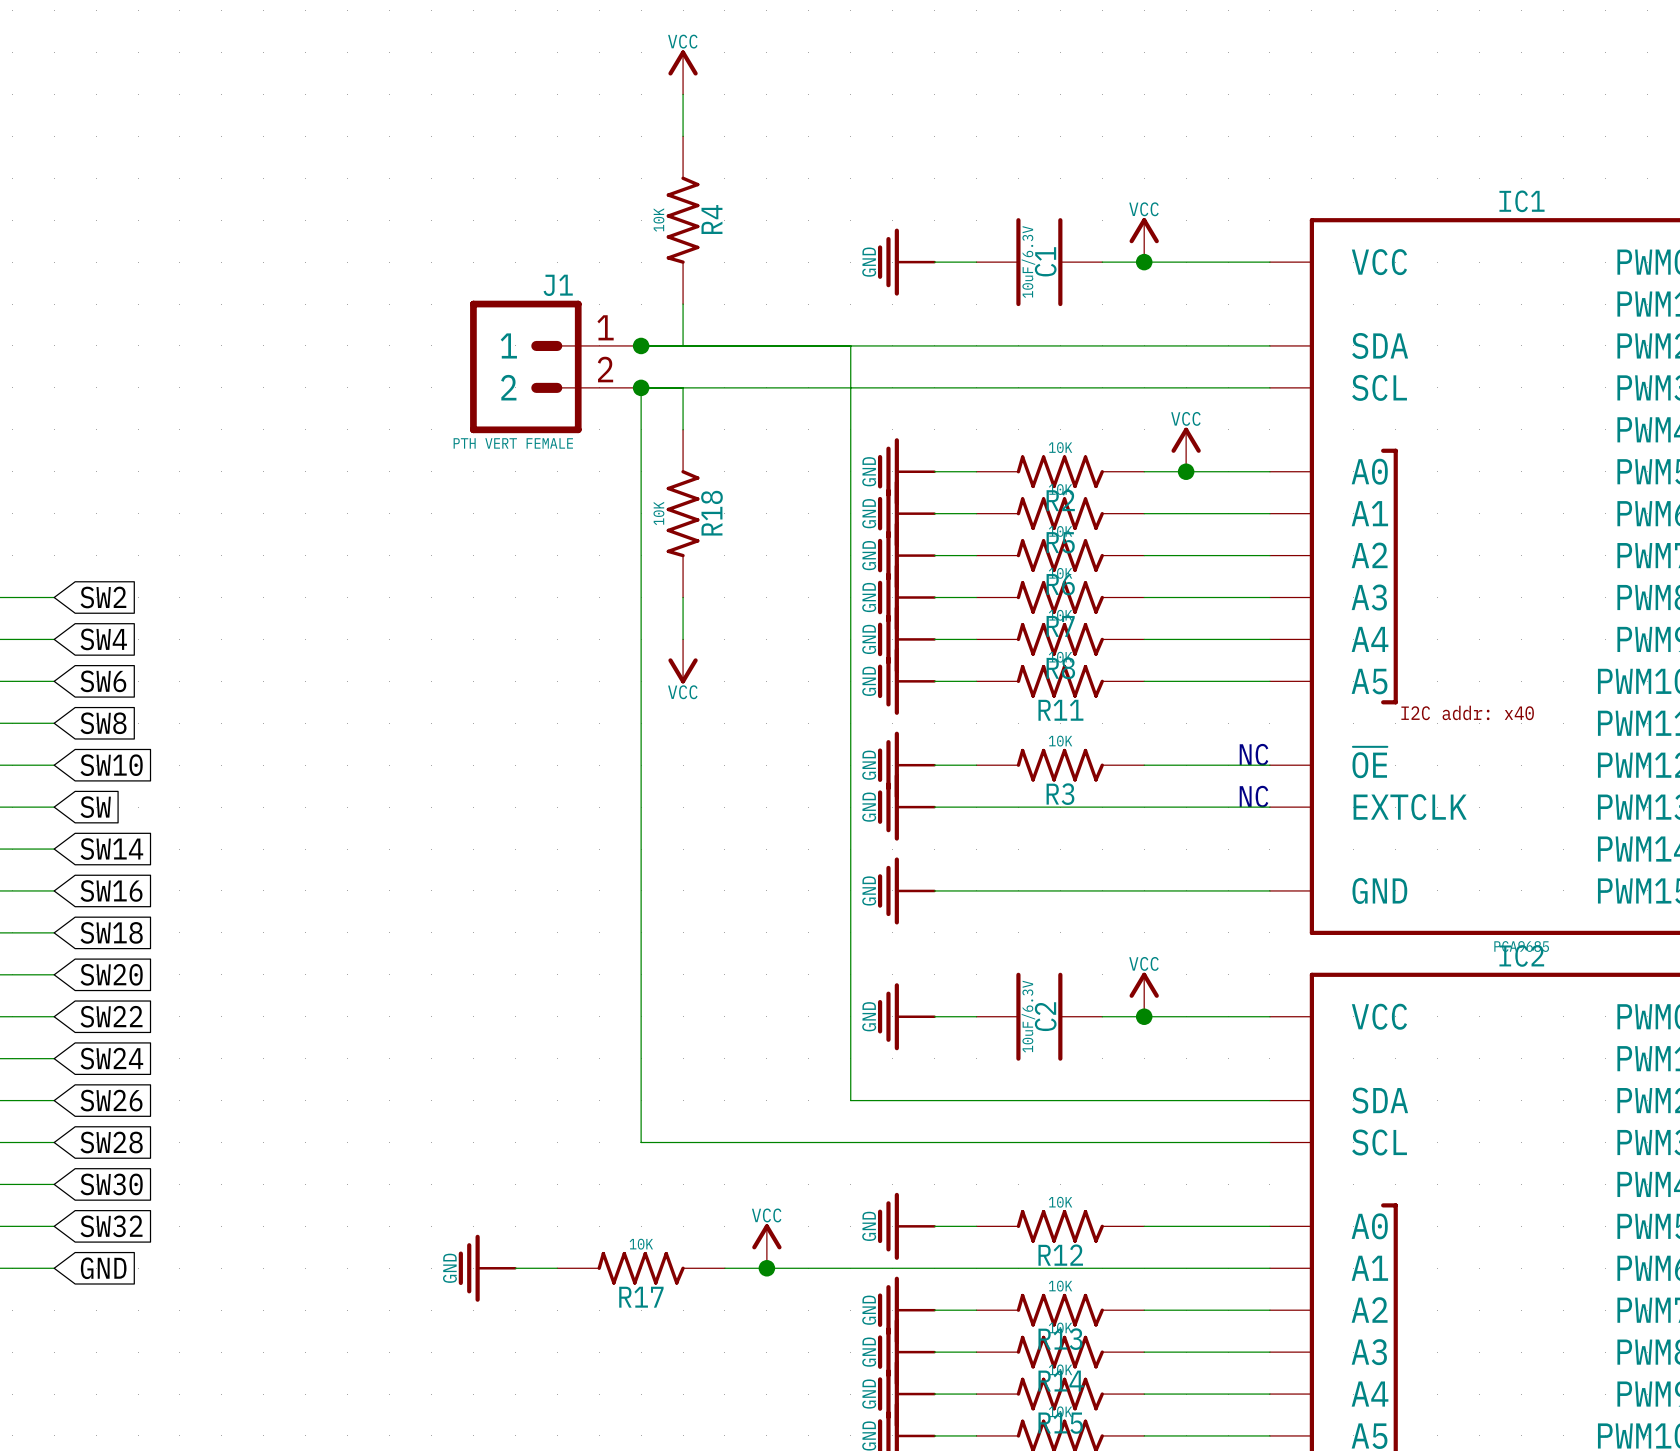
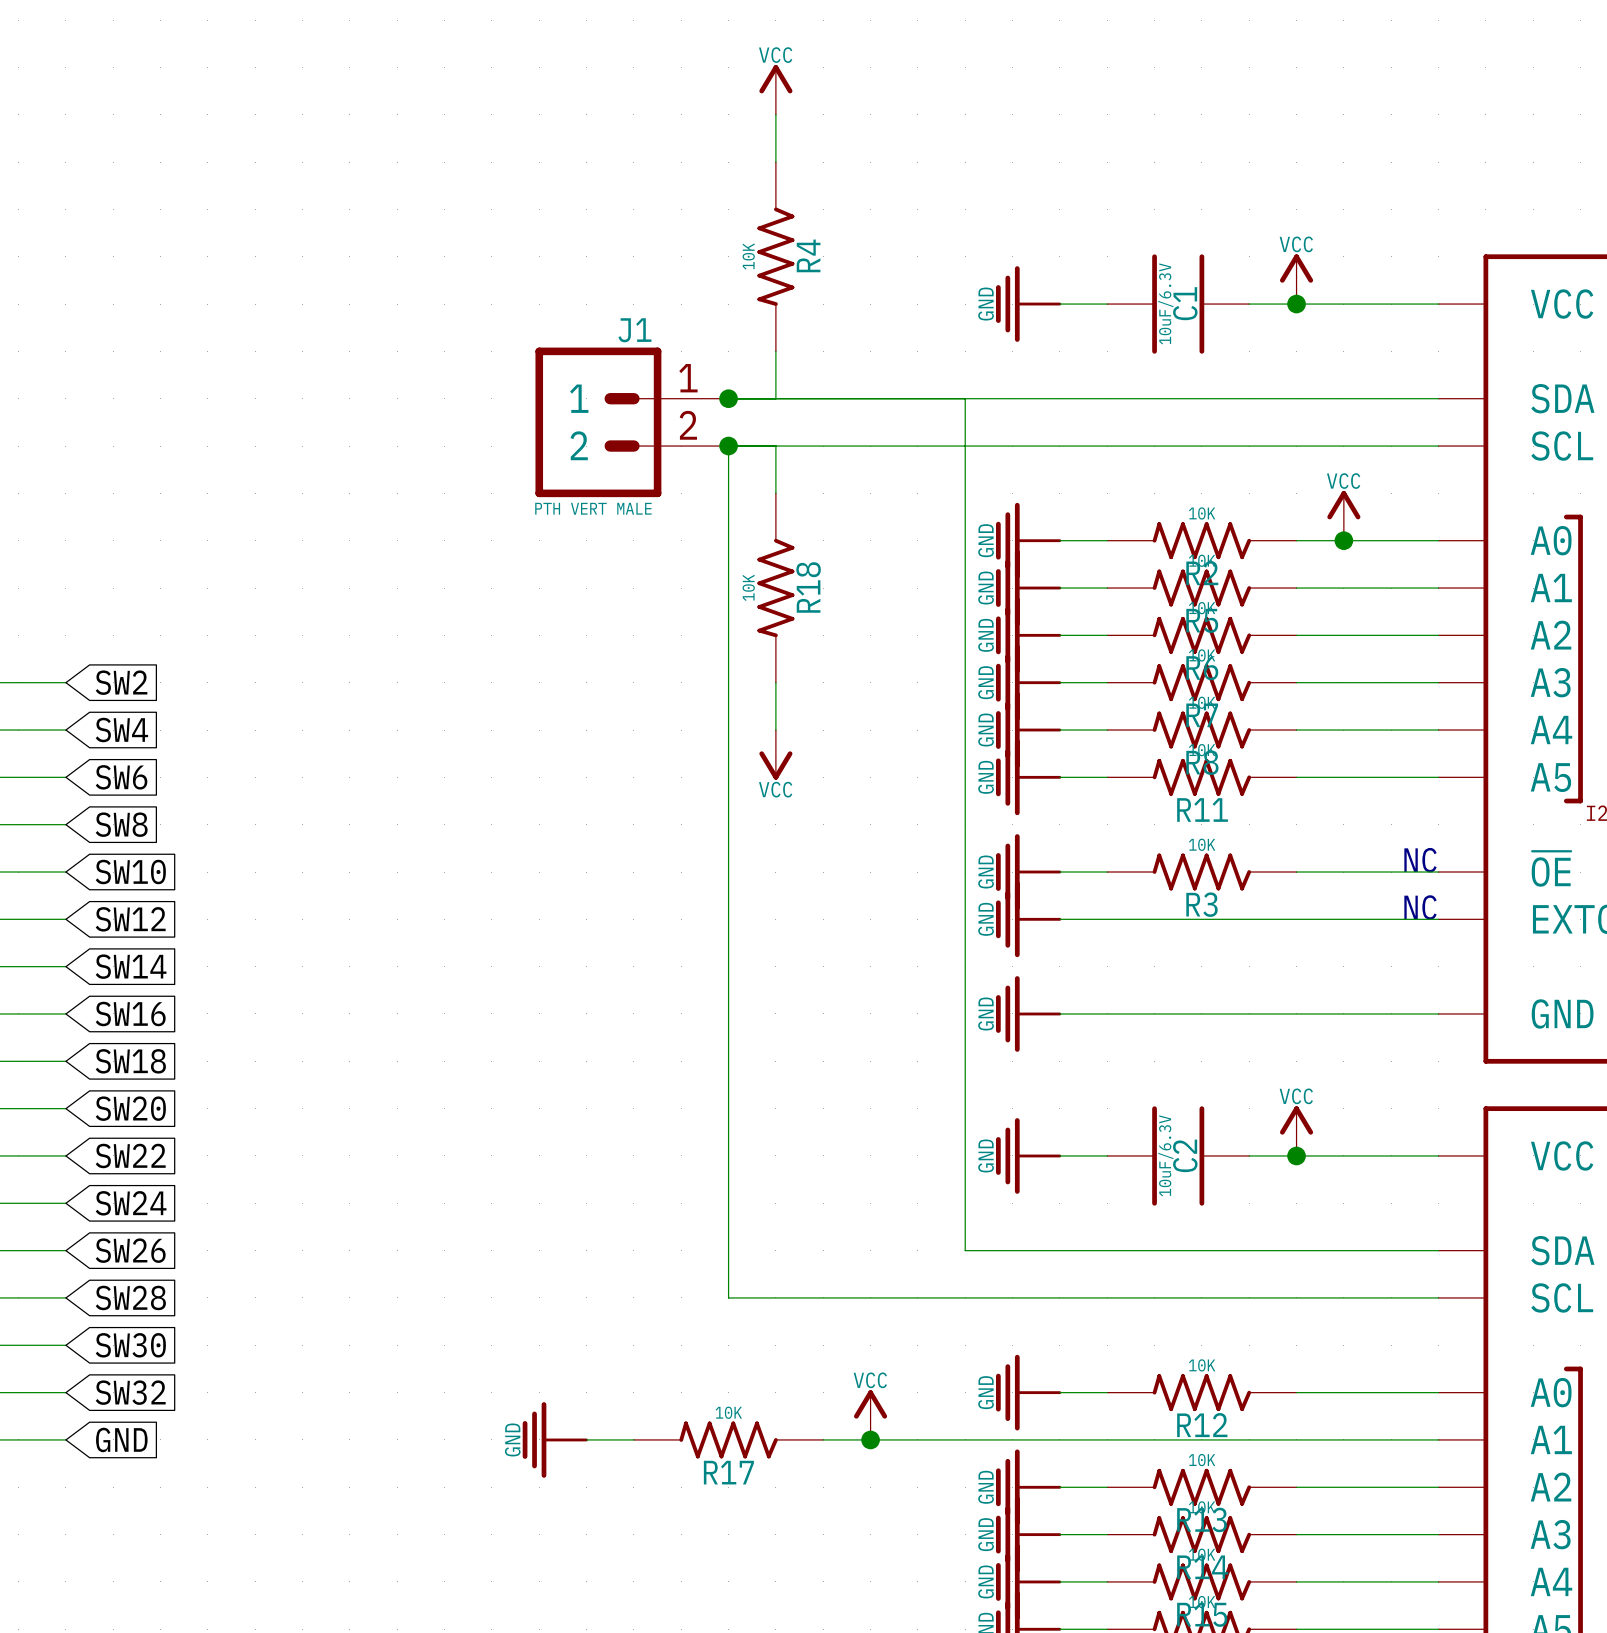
J1 value: PTH VERT FEMALE (513, 443) -> PTH VERT MALE (593, 508)
global label: SW (95, 807) -> SW12 (130, 919)

